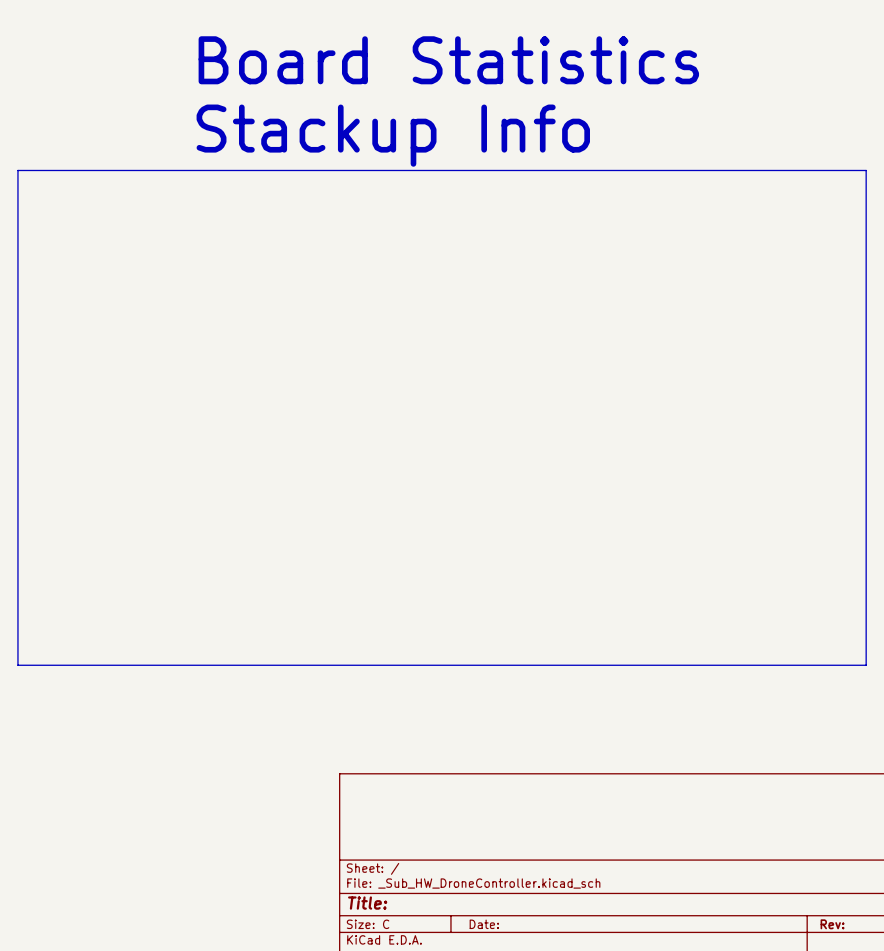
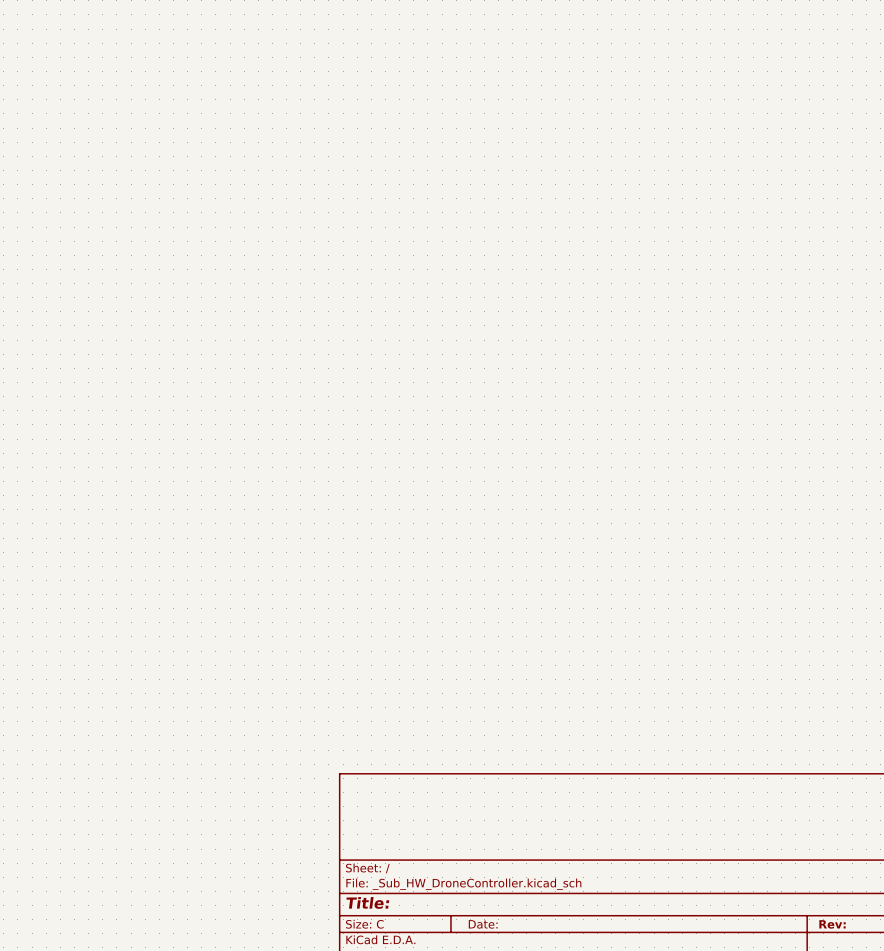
text: Board Statistics (448, 60) -> none
text: Stackup Info (393, 135) -> none
line: (17, 170) (866, 170) (866, 665) (17, 665) (17, 170) -> none

